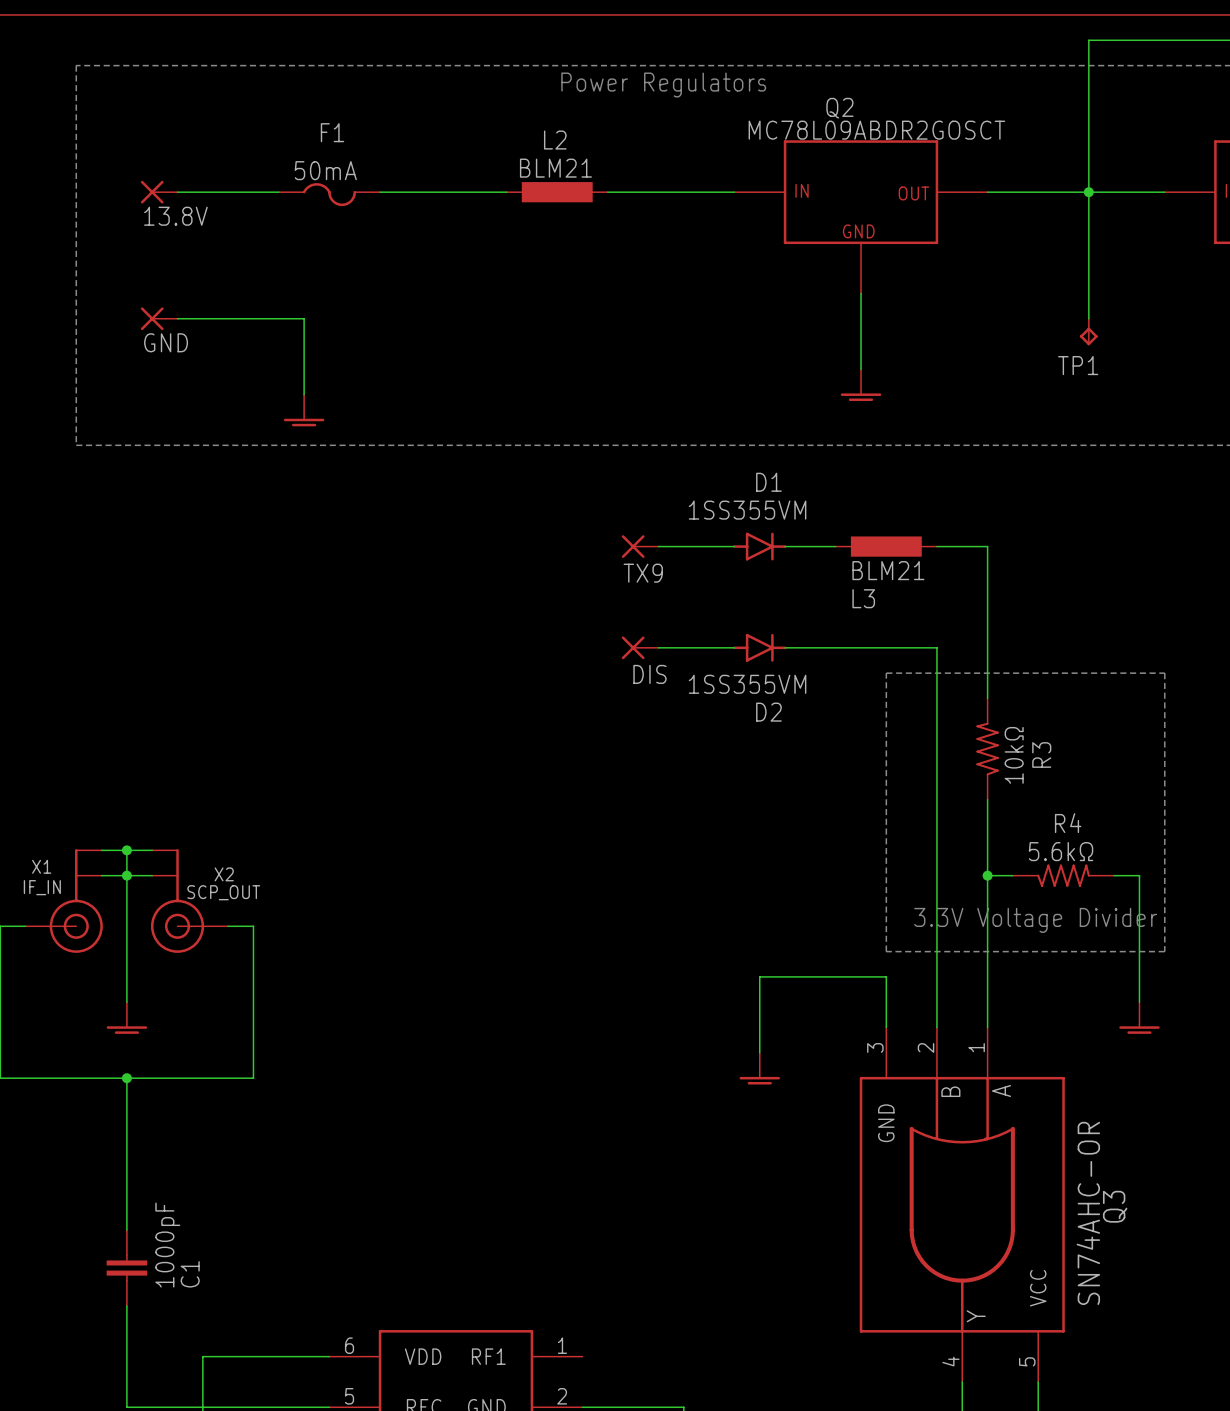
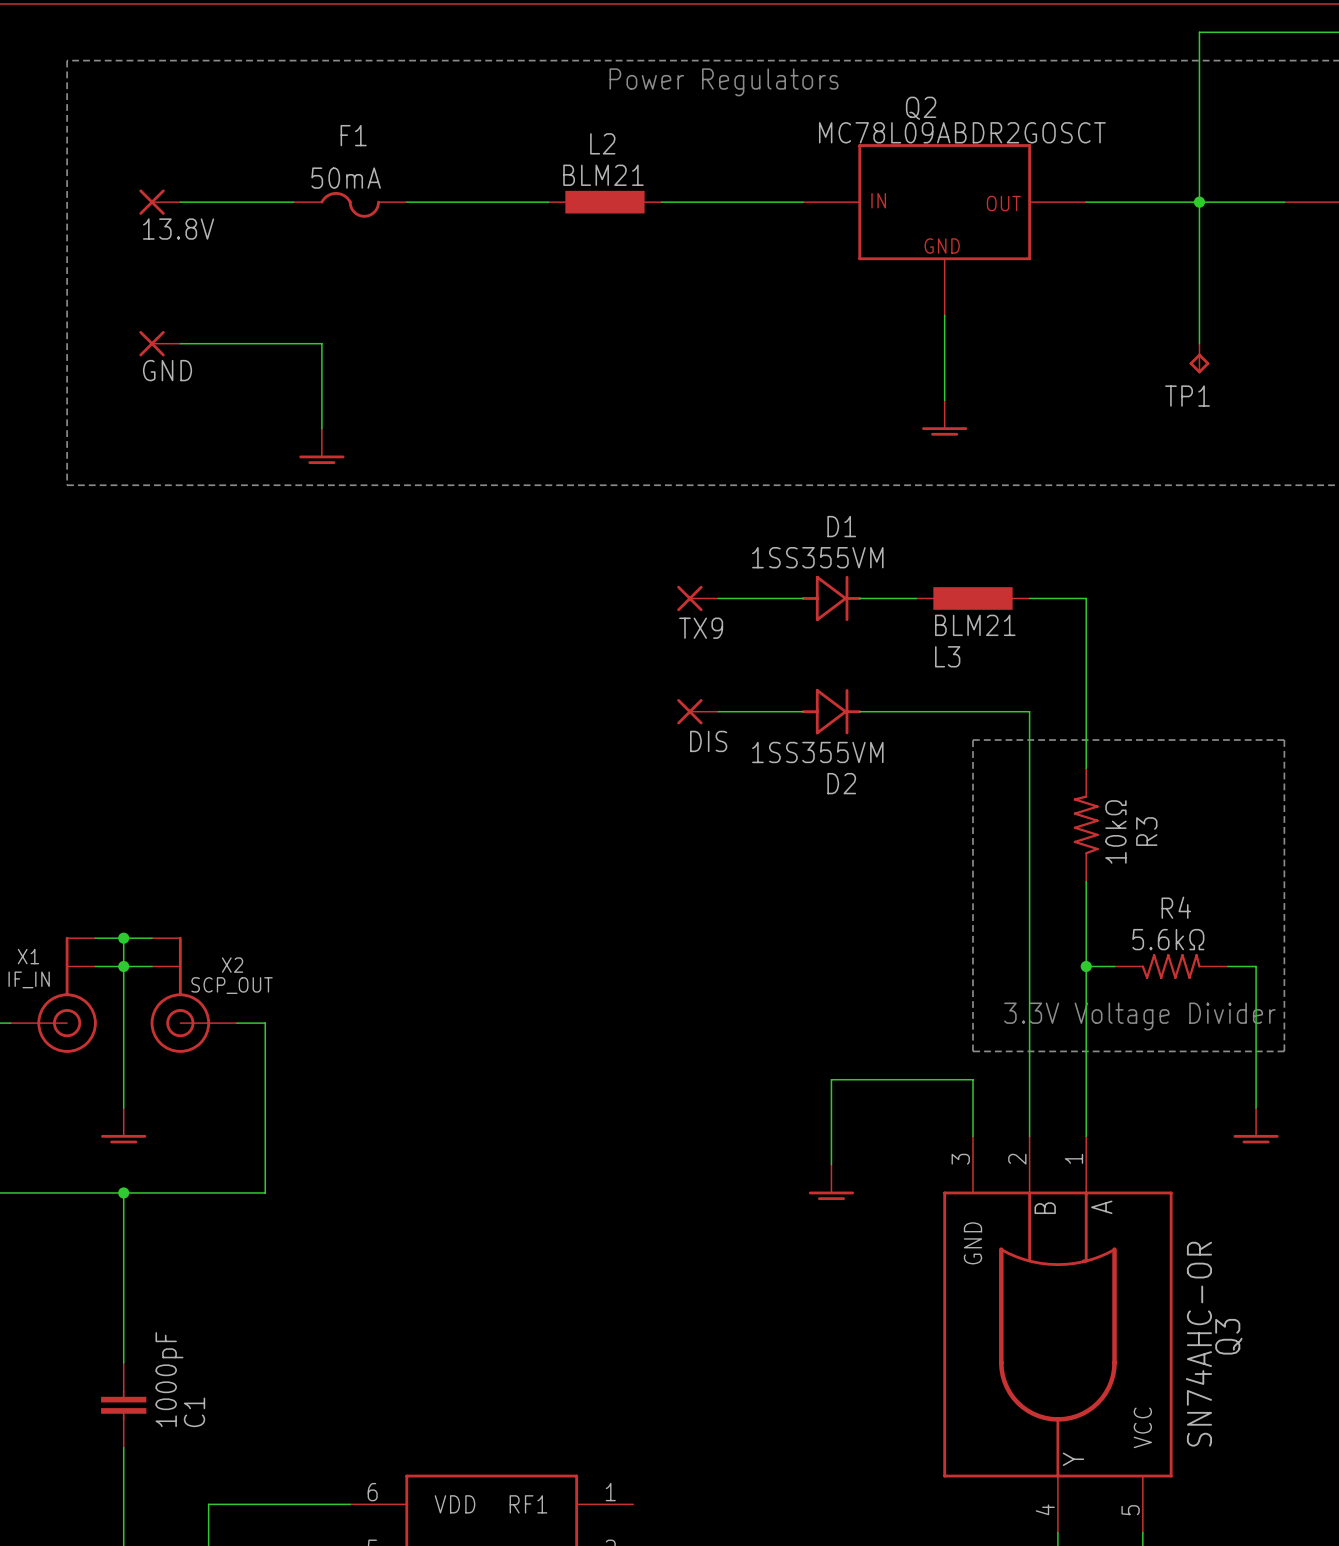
D1 symbol: [733, 532, 787, 561] -> [801, 575, 862, 622]
D2 symbol: [733, 633, 787, 662] -> [801, 689, 862, 735]

